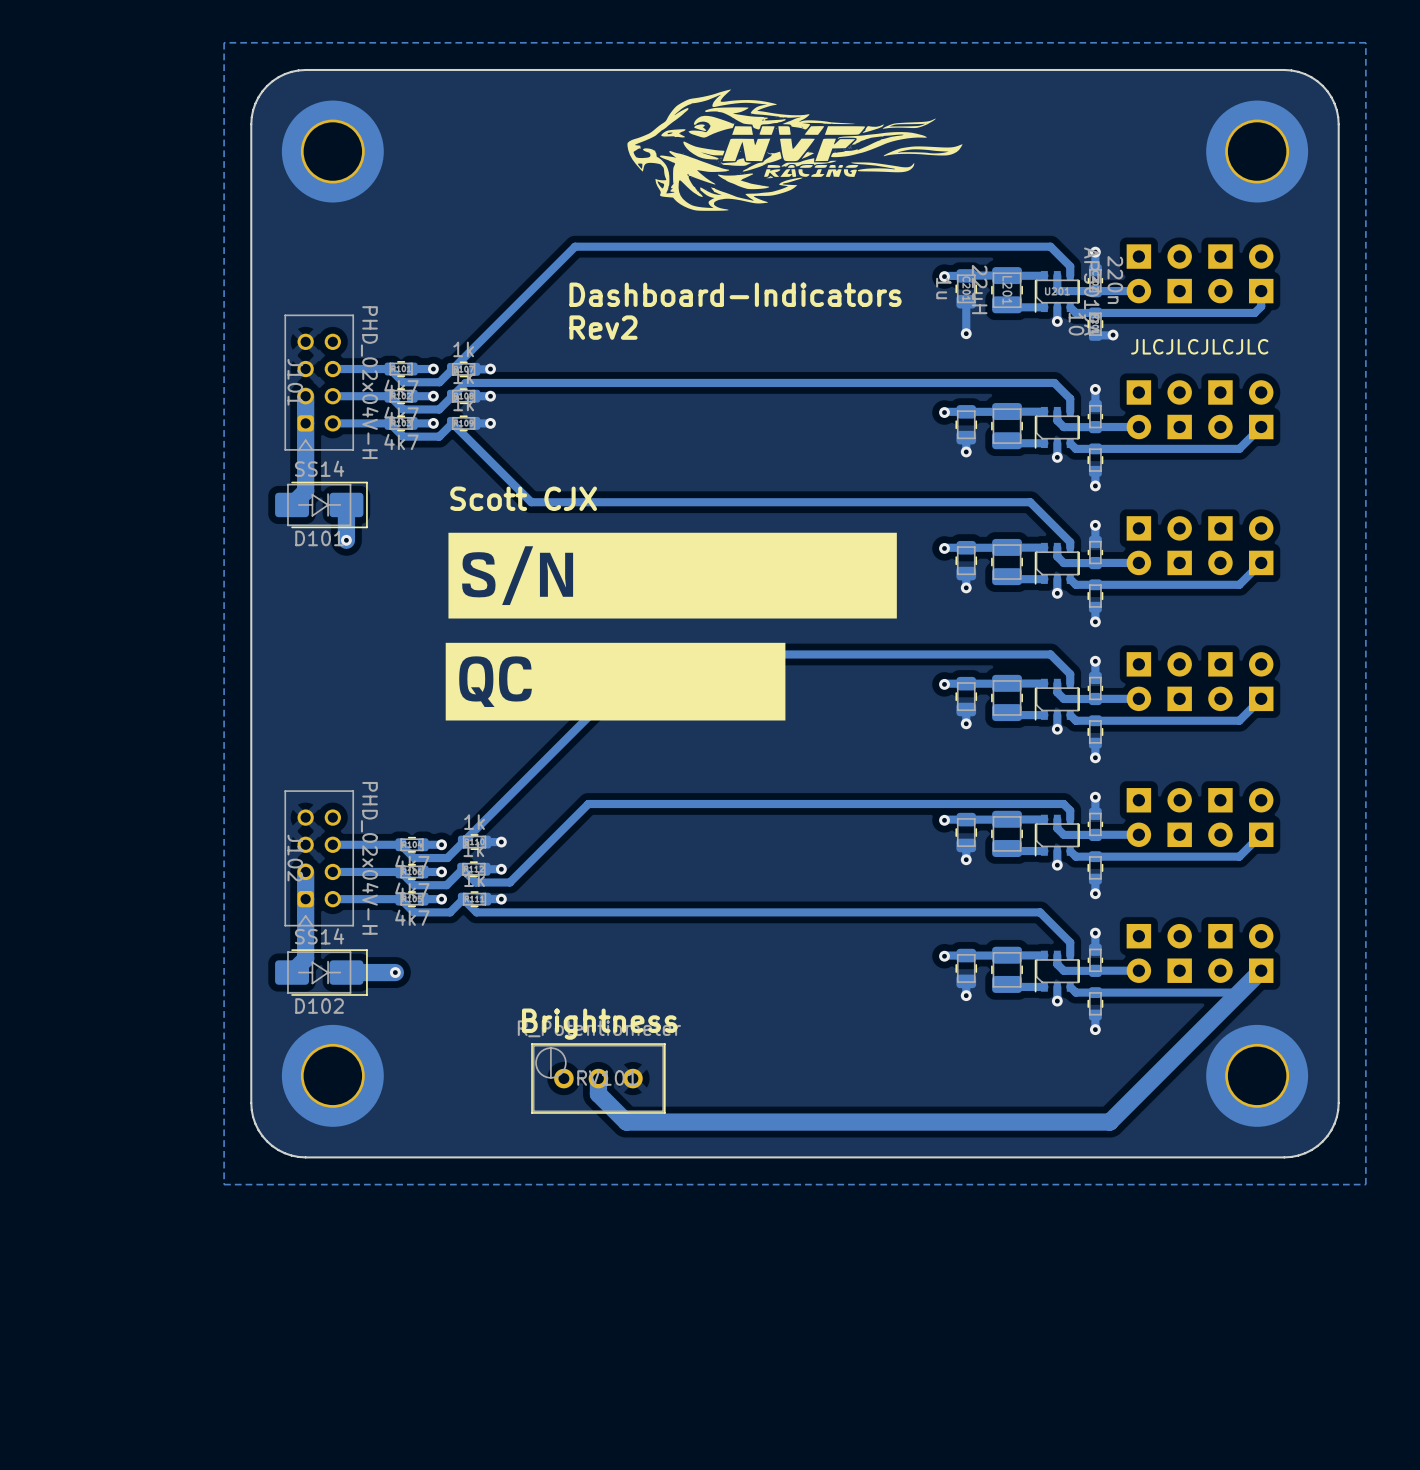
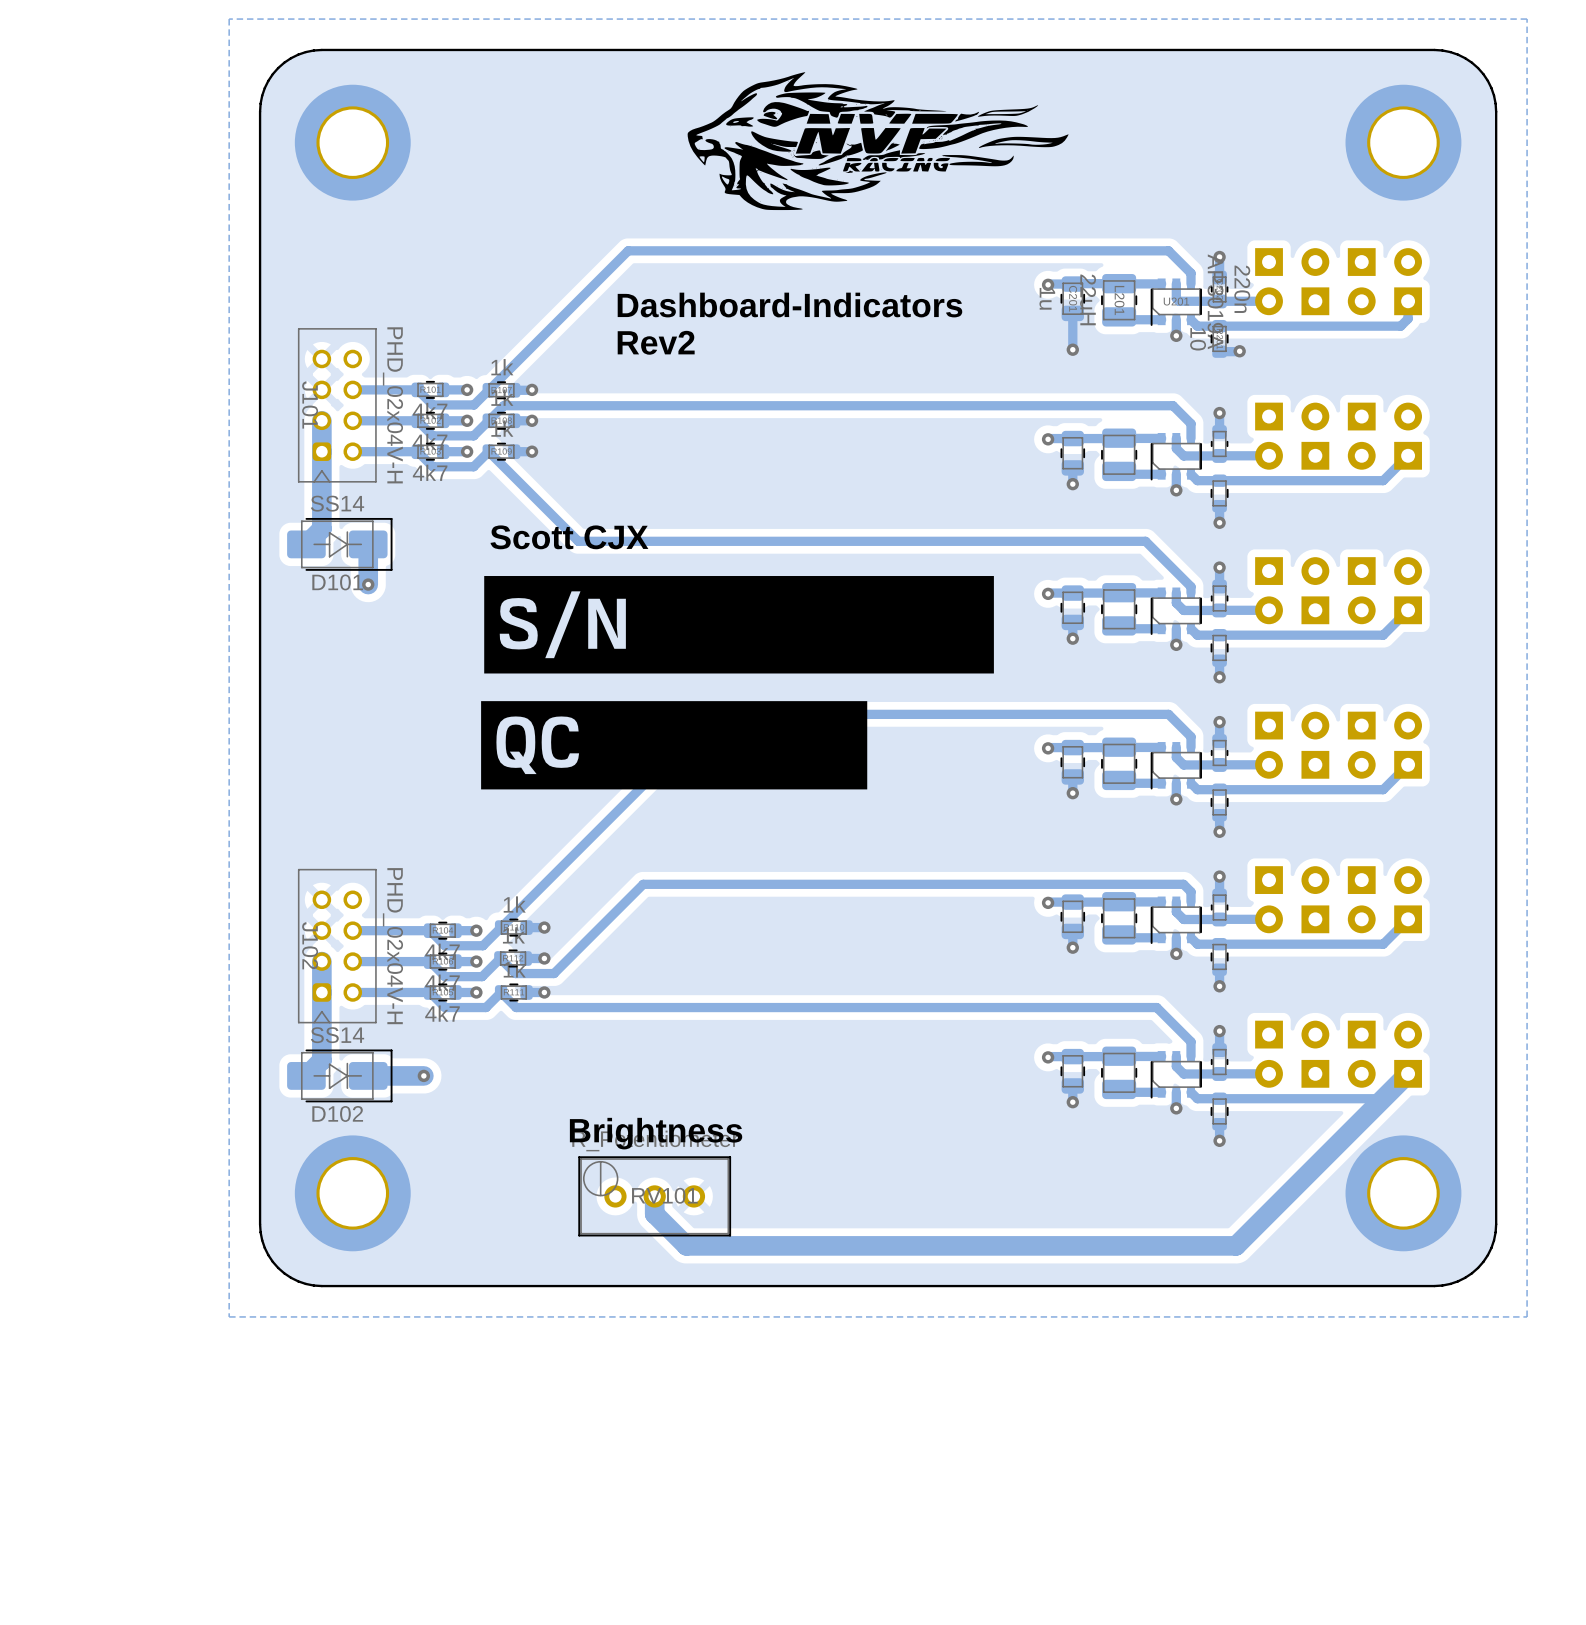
text: JLCJLCJLCJLC (1199, 346) -> none

